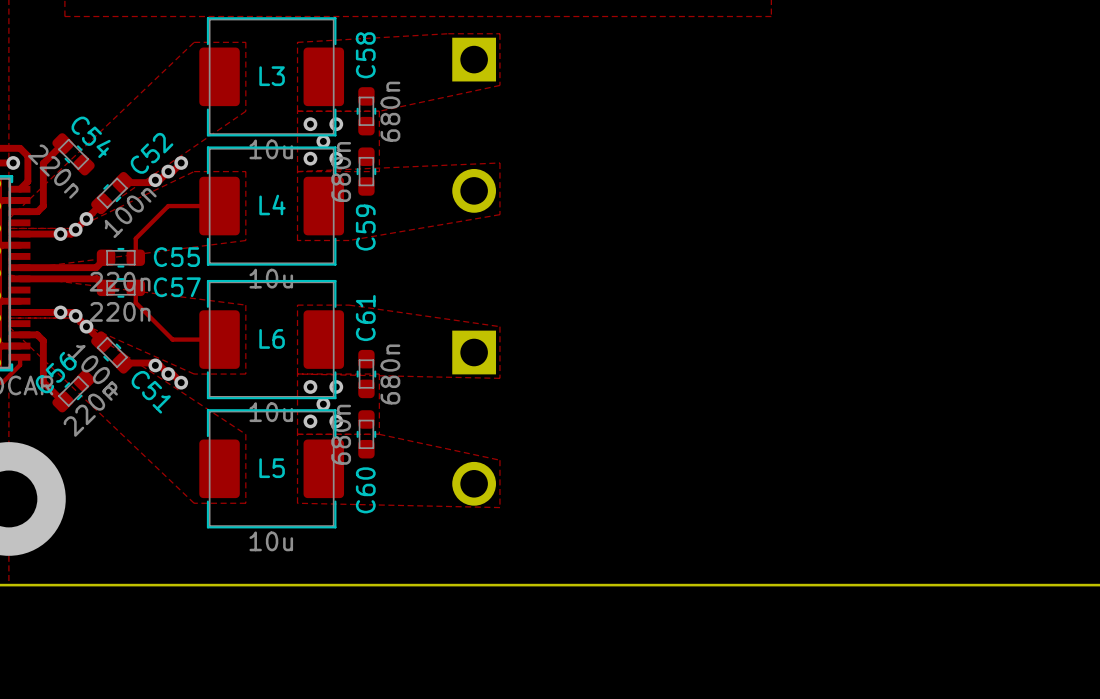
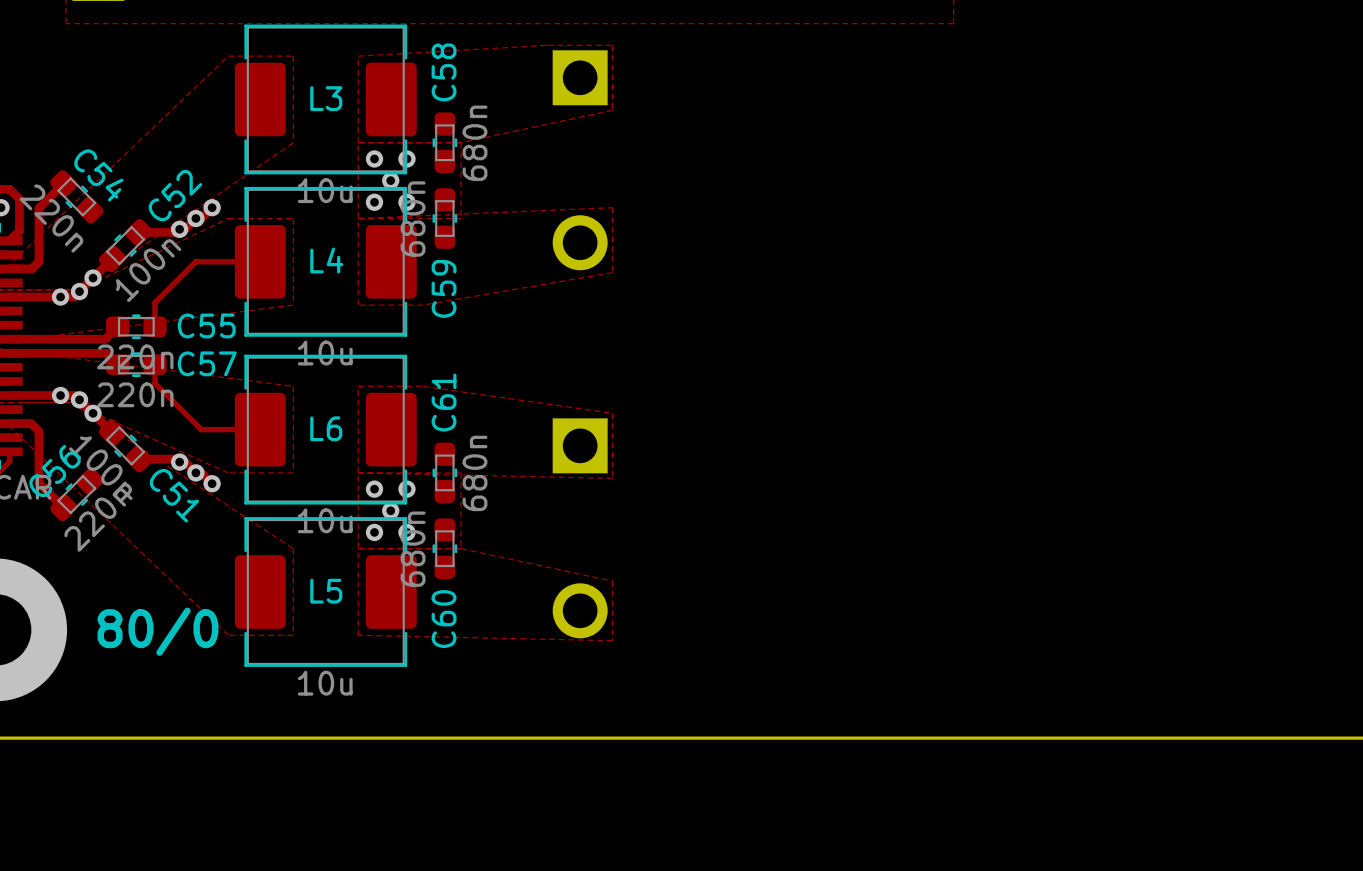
text: none -> 80/0 (157, 631)

